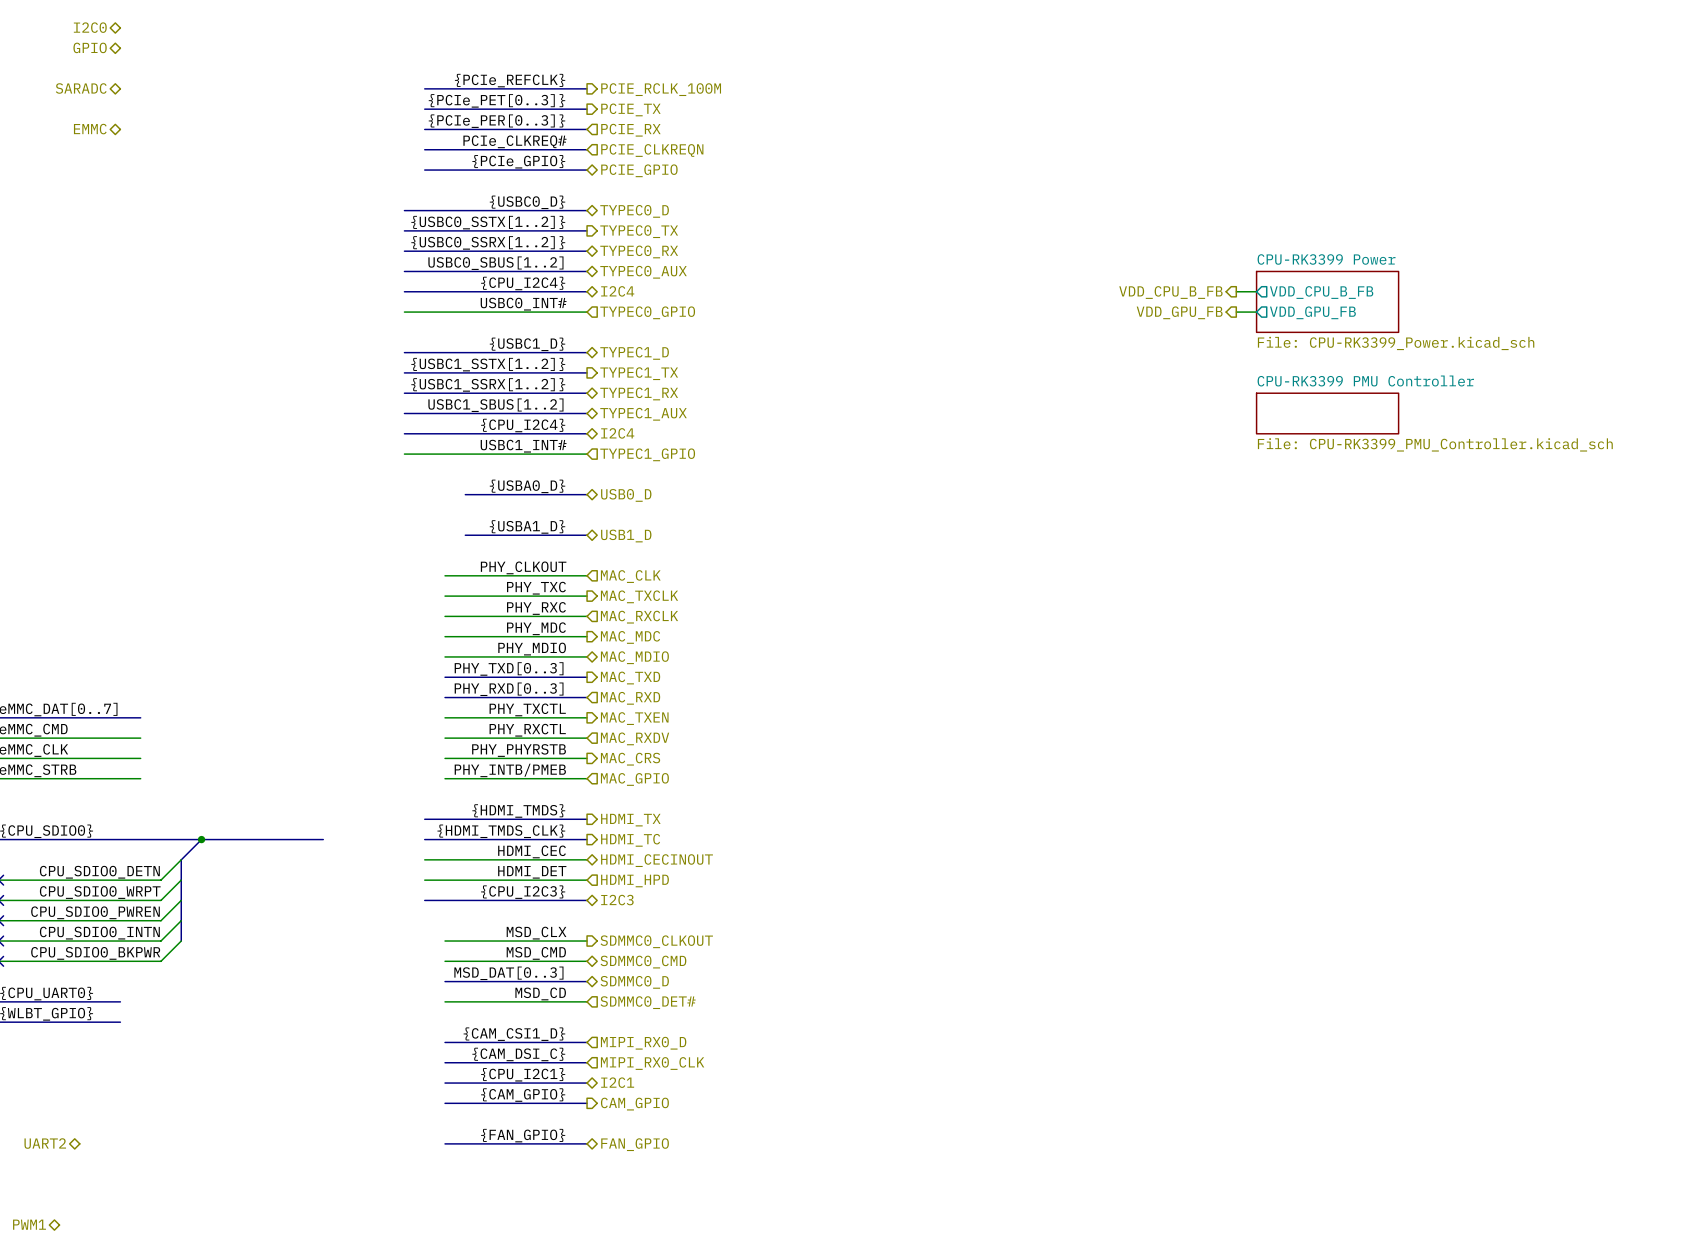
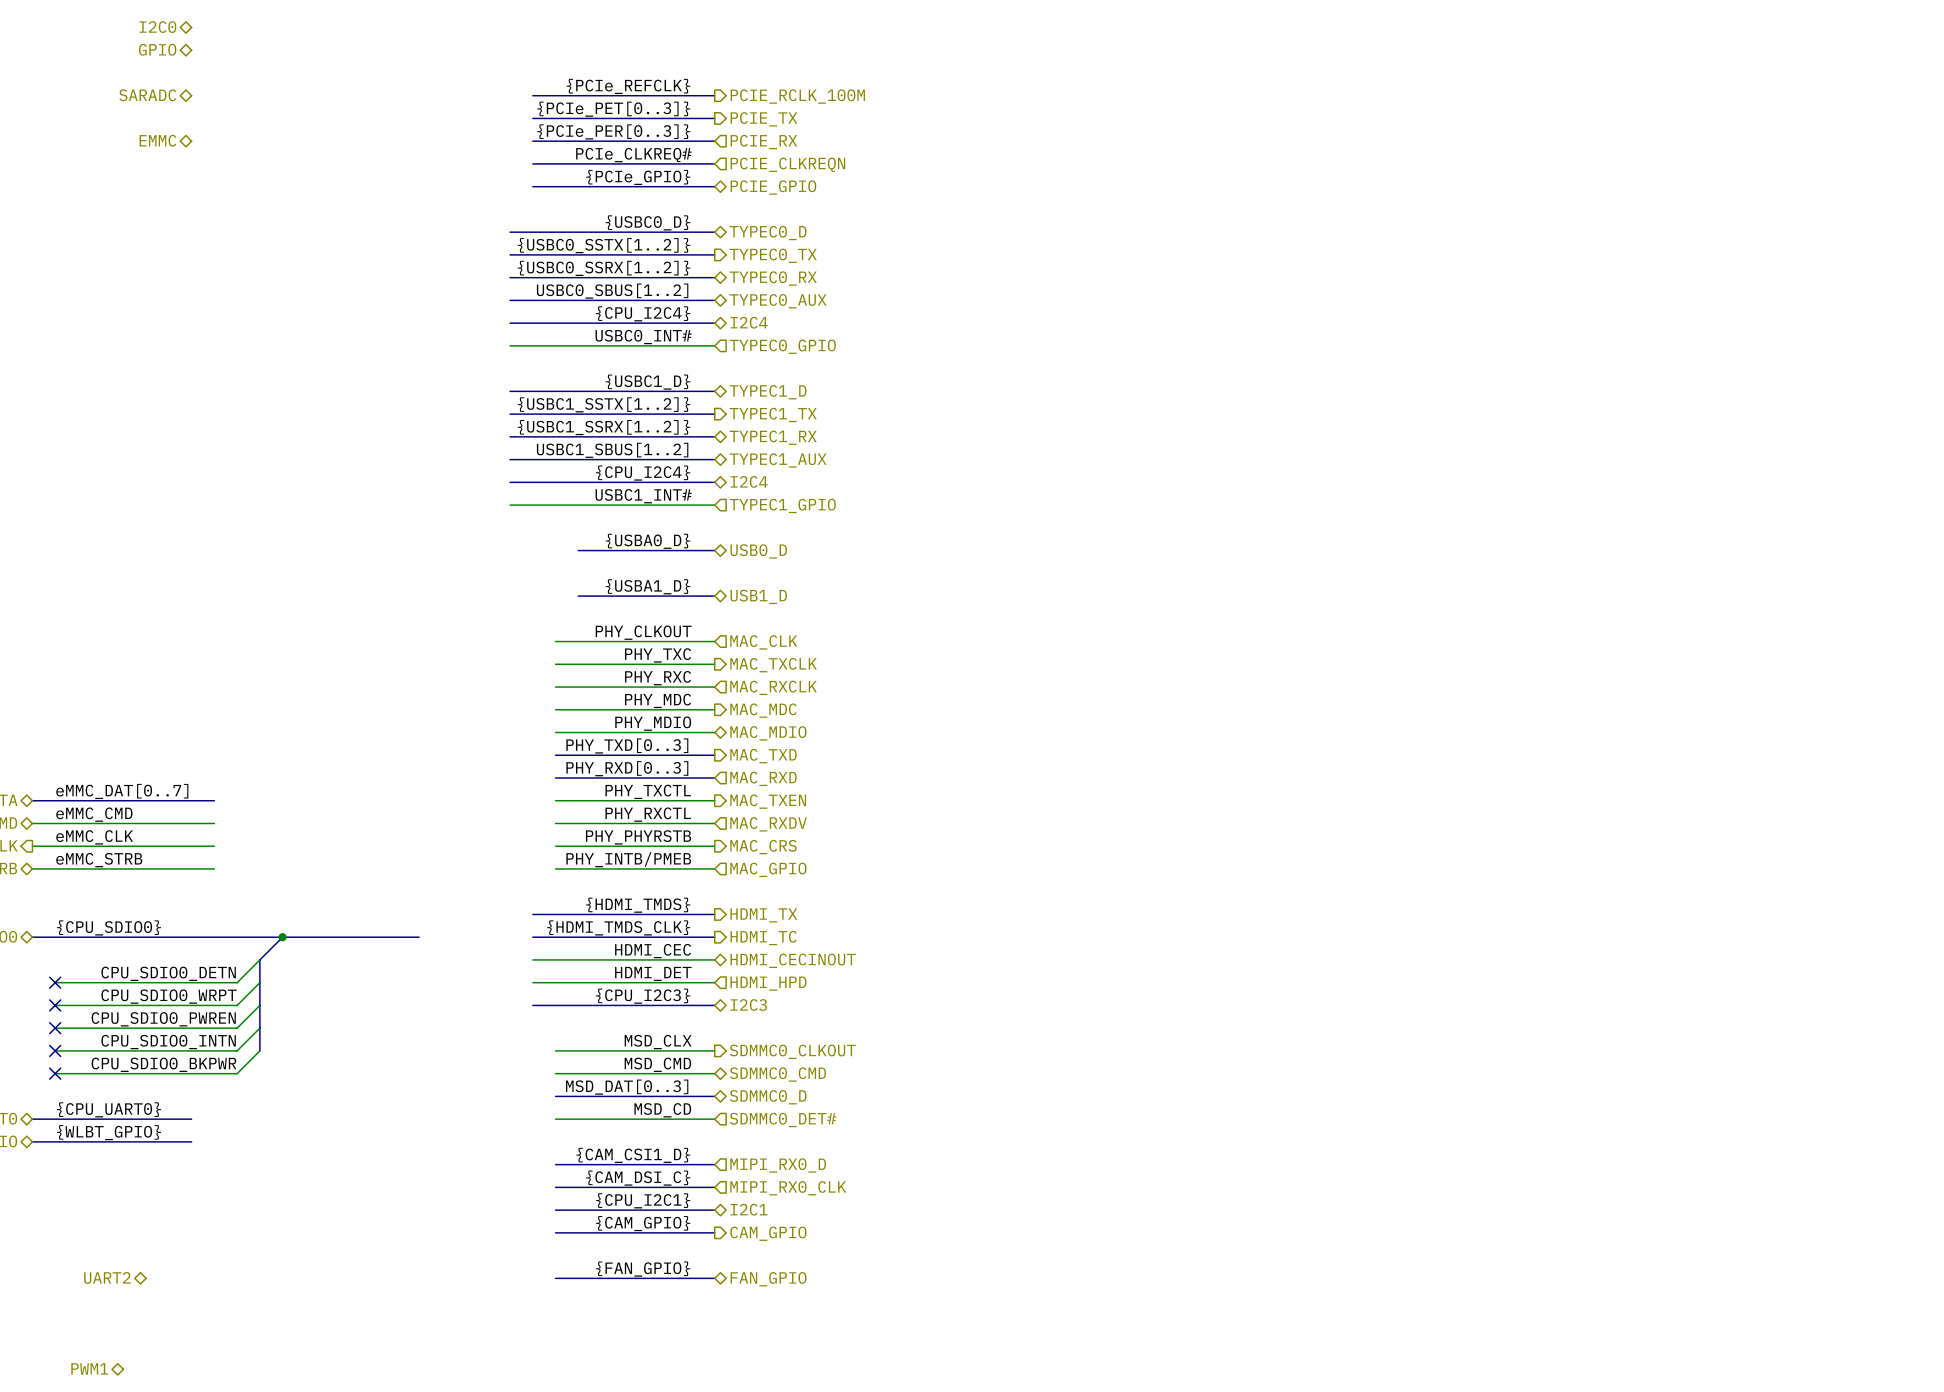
wire: (1236, 291) (1256, 291) -> none
hierarchical label: VDD_CPU_B_FB (1170, 292) -> none
sheet pin: VDD_CPU_B_FB (1321, 292) -> none
sheet CPU-RK3399 Power: File: CPU-RK3399_Power.kicad_sch (1327, 301) -> none
hierarchical label: VDD_GPU_FB (1179, 312) -> none
wire: (1236, 312) (1256, 312) -> none
sheet pin: VDD_GPU_FB (1312, 312) -> none
sheet CPU-RK3399 PMU Controller: File: CPU-RK3399_PMU_Controller.kicad_sch (1327, 413) -> none

